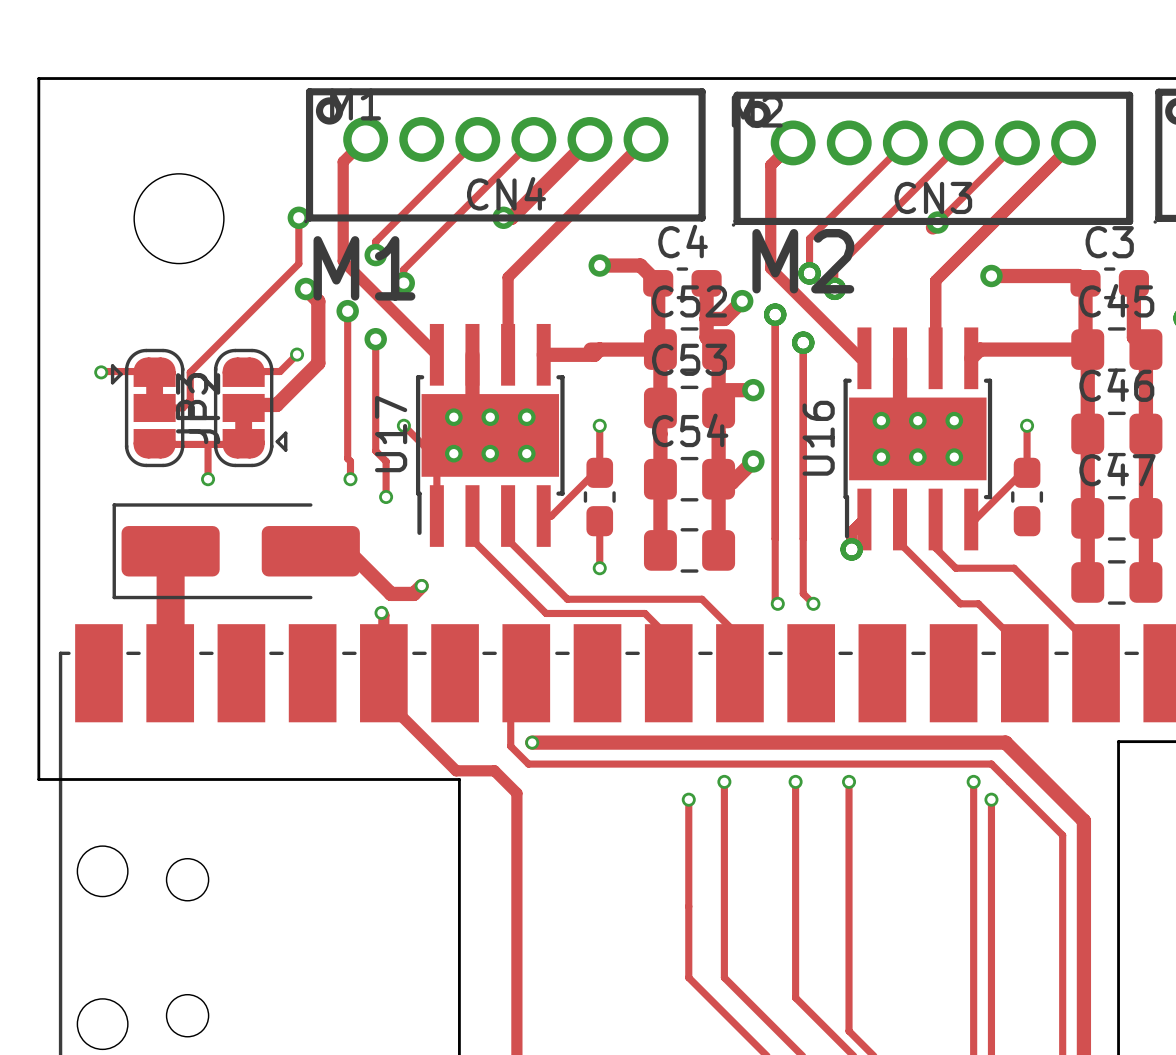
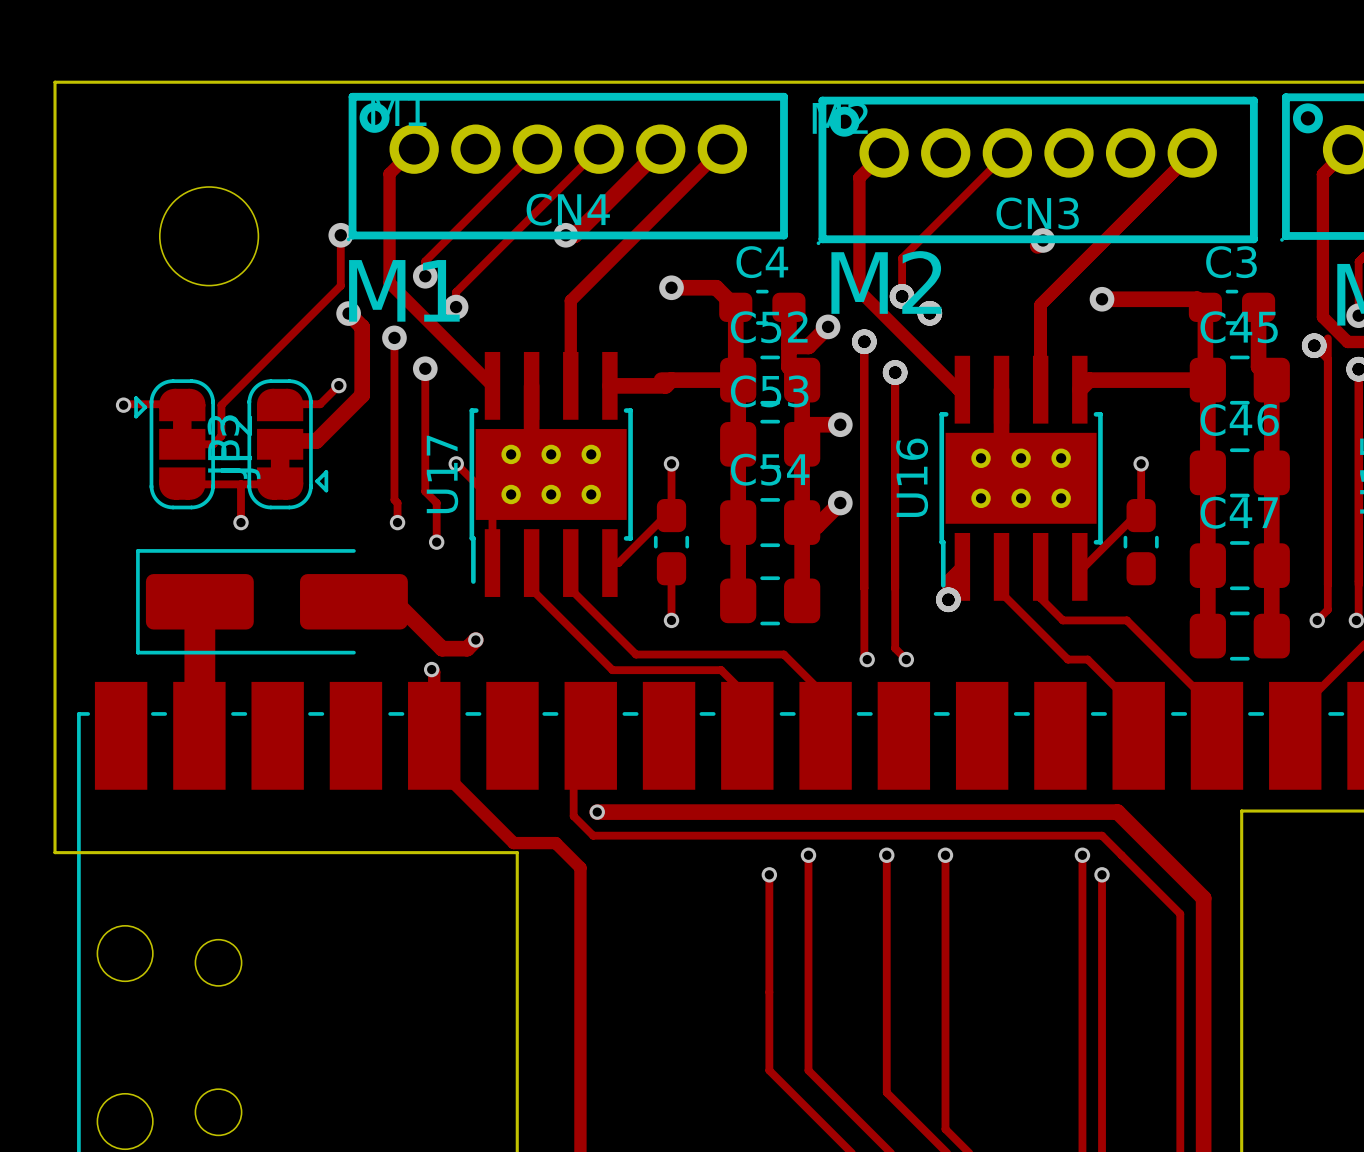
track: (961, 142) (834, 269) (834, 288) -> none
track: (1017, 142) (937, 222) -> none

